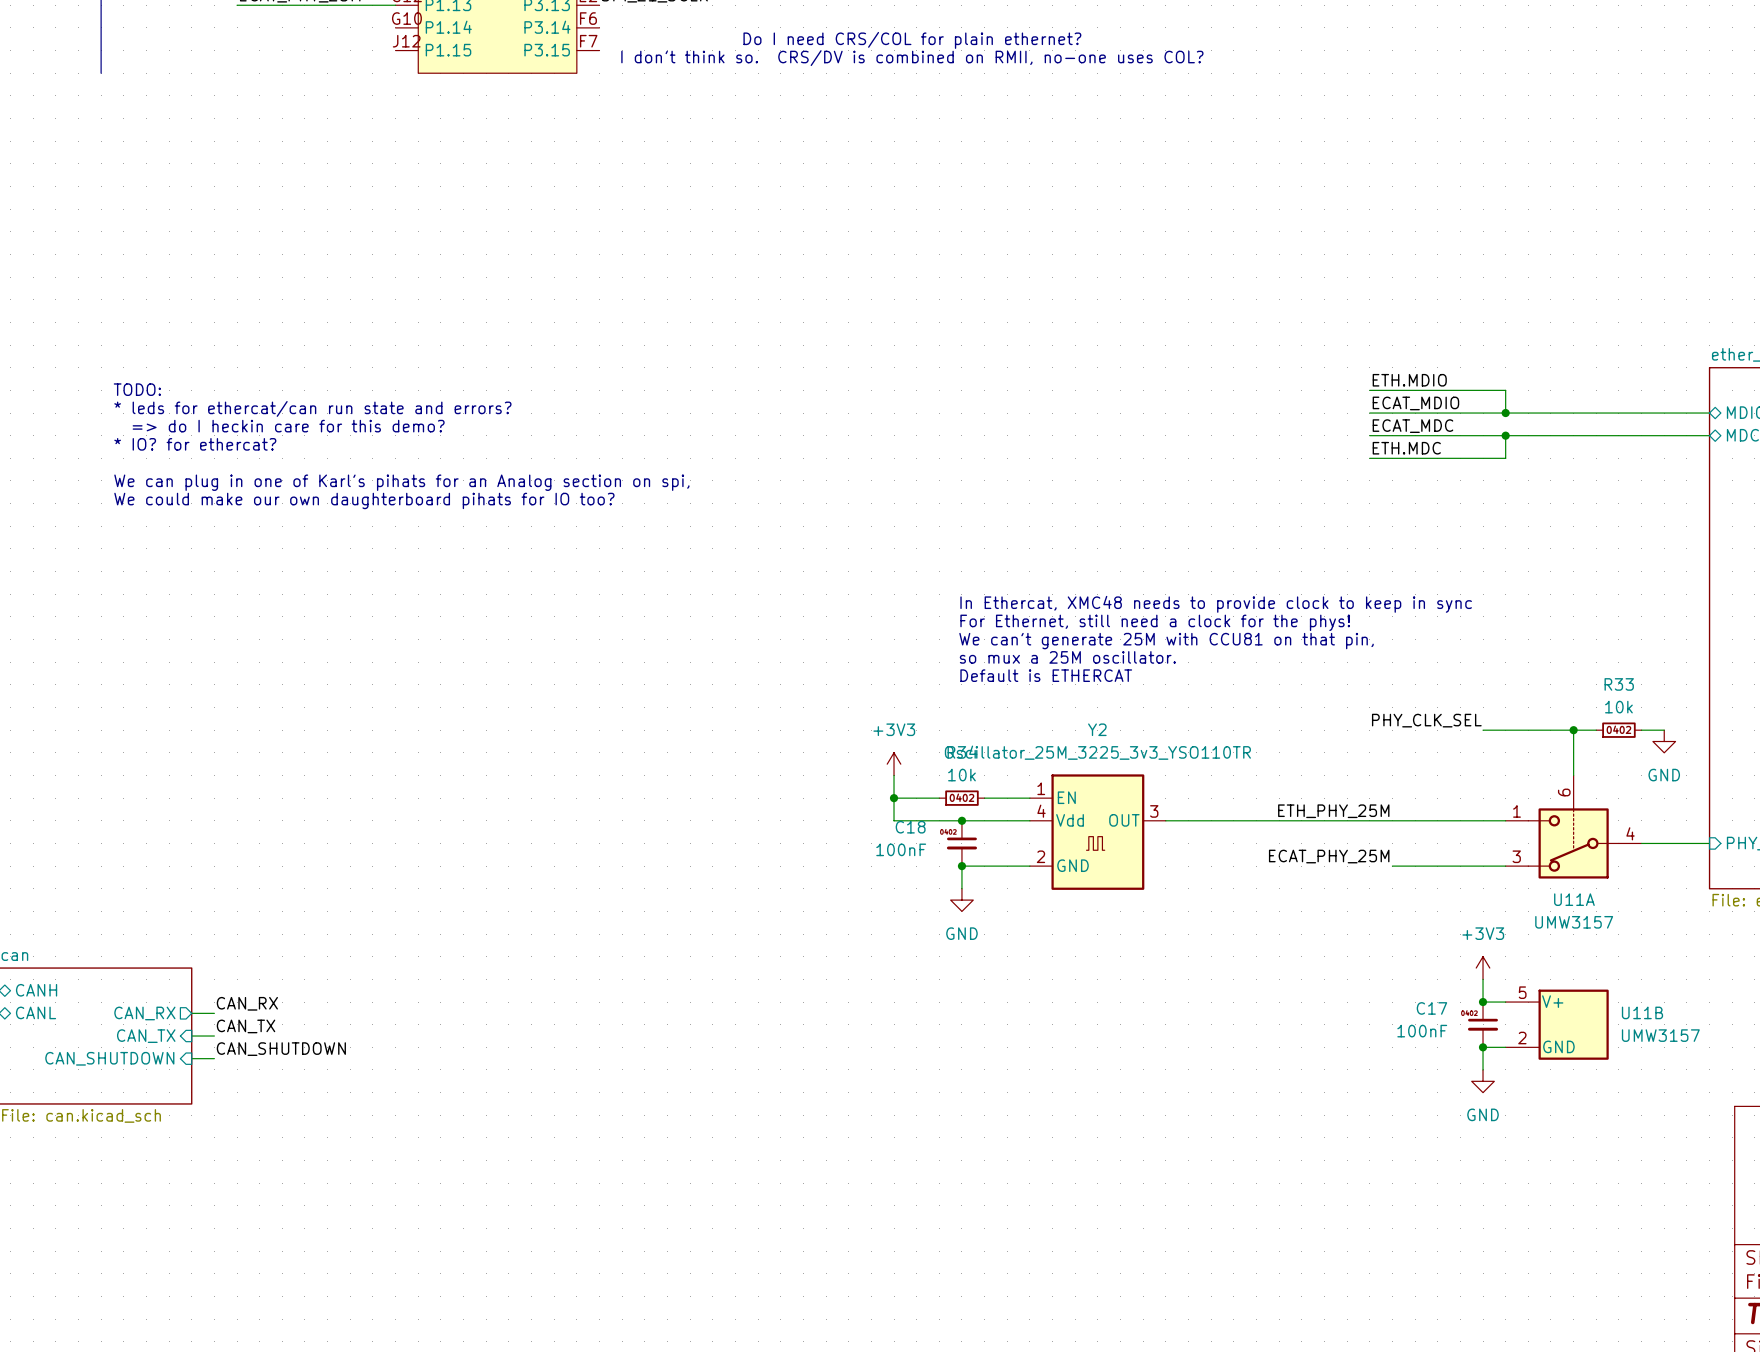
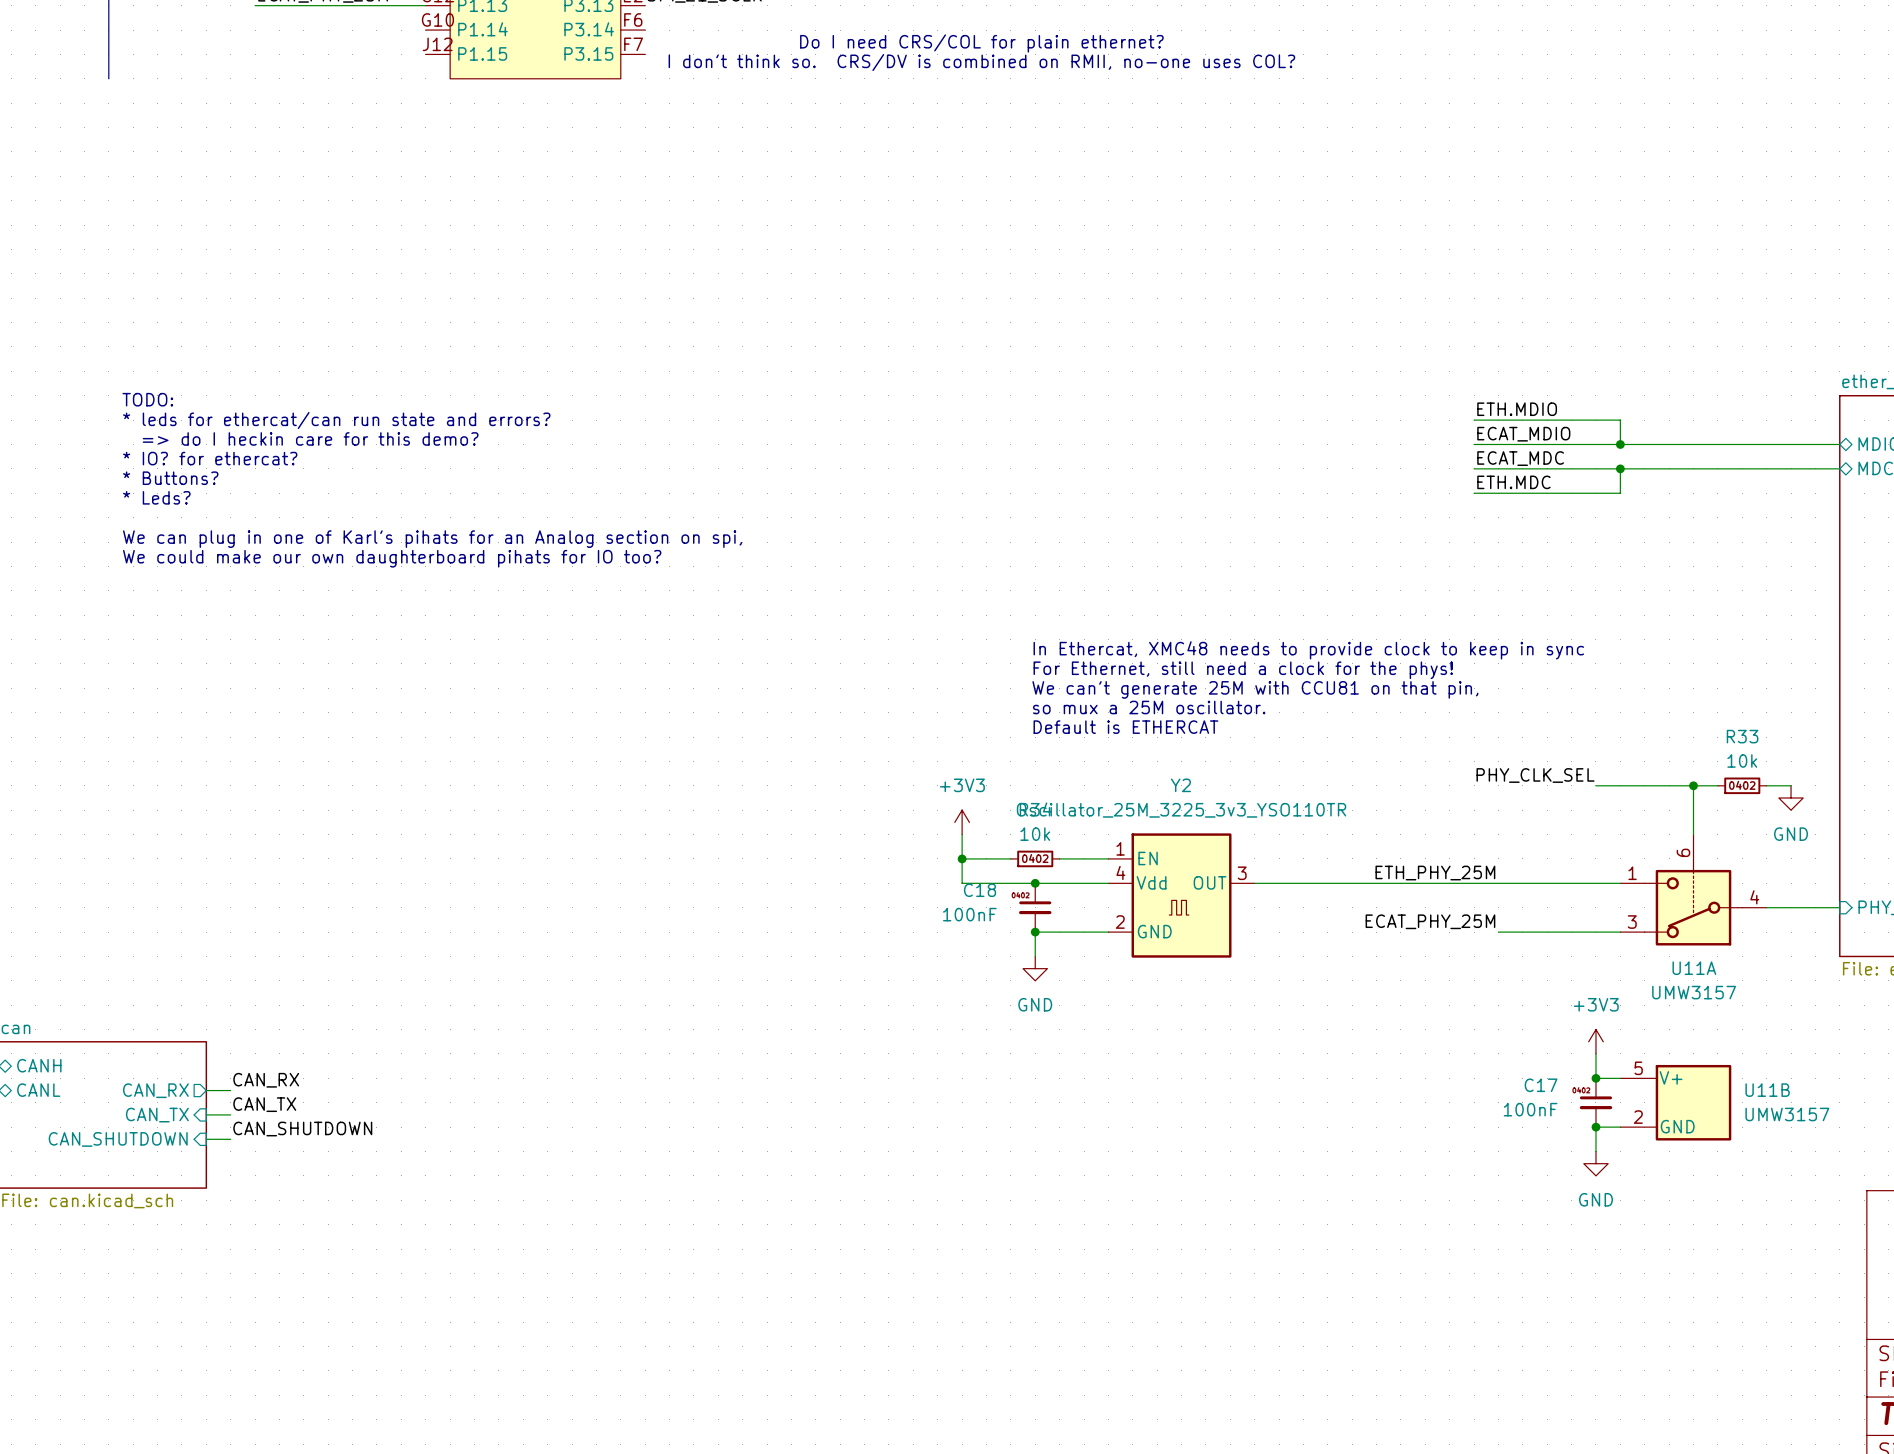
text: none -> TODO: (147, 399)
text: TODO: (137, 389) -> * leds for ethercat/can run state and errors? (336, 420)
text: * leds for ethercat/can run state and errors? (312, 408) -> => do I heckin care for this demo? (310, 438)
text: => do I heckin care for this demo? (288, 426) -> * IO? for ethercat? (210, 458)
text: * IO? for ethercat? (195, 444) -> * Buttons? (170, 478)
text: none -> * Leds? (156, 497)
text: We can plug in one of Karl's pihats for an Analog section on spi, (401, 482) -> none
text: We could make our own daughterboard pihats for IO too? (364, 500) -> We can plug in one of Karl's pihats for an Analog section on spi, (432, 539)
text: none -> We could make our own daughterboard pihats for IO too? (392, 558)

